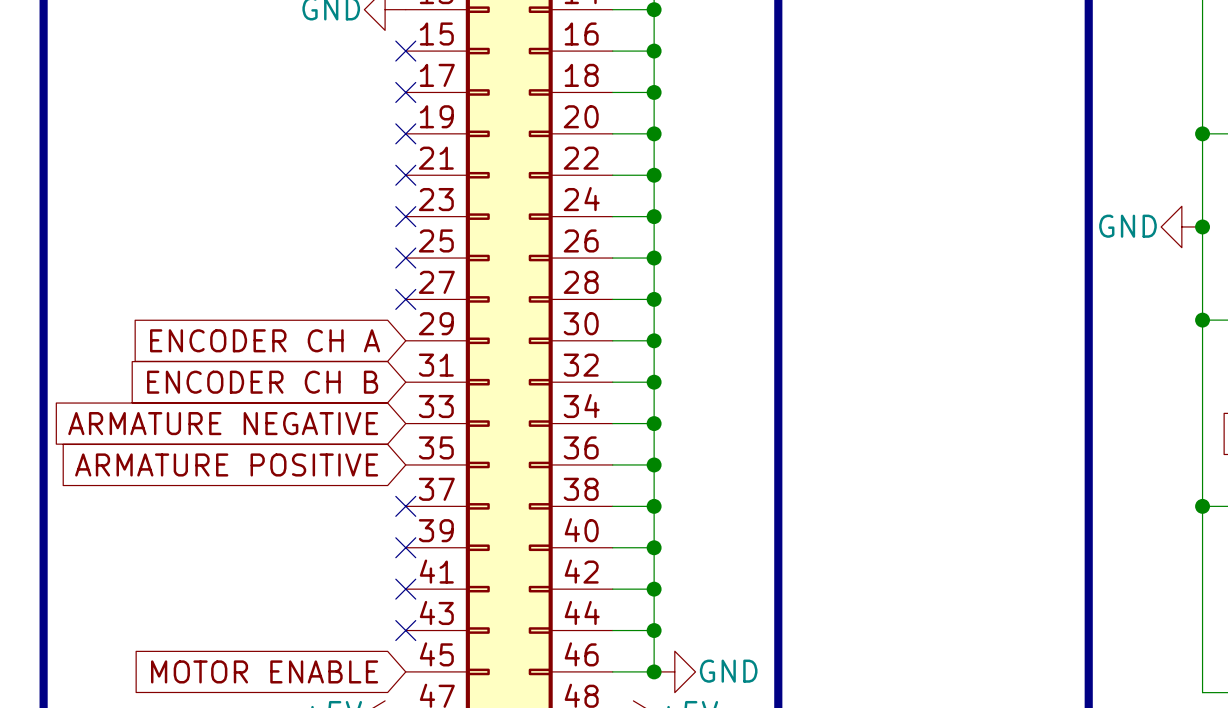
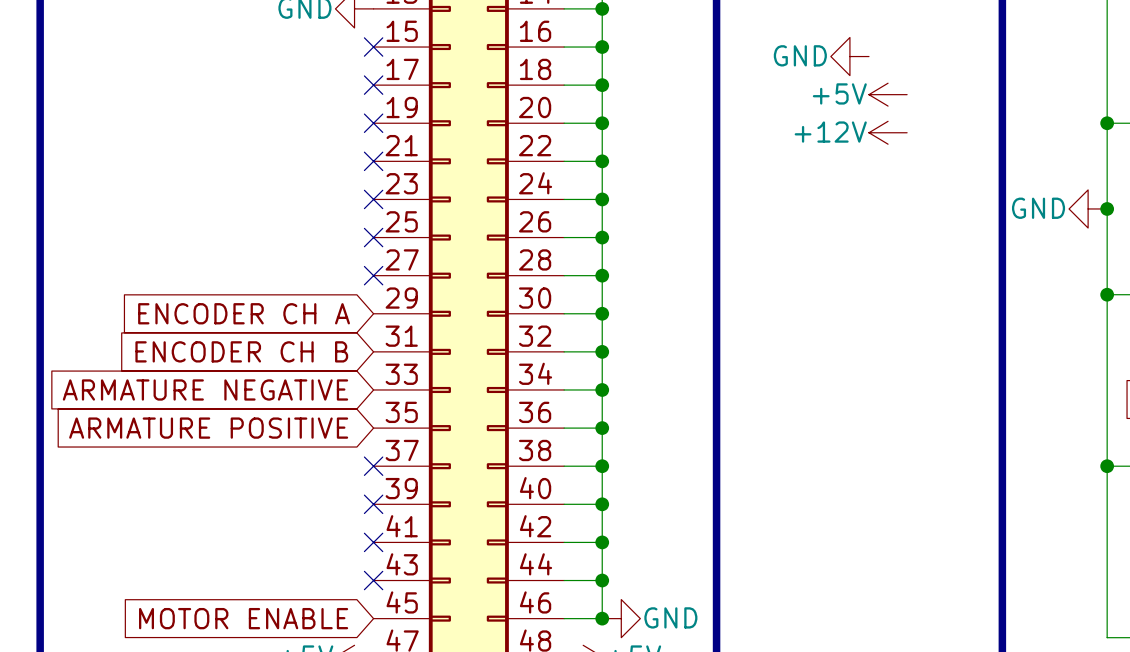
power symbol: none -> GND (849, 56)
power symbol: none -> +5V (888, 94)
power symbol: none -> +12V (888, 132)

